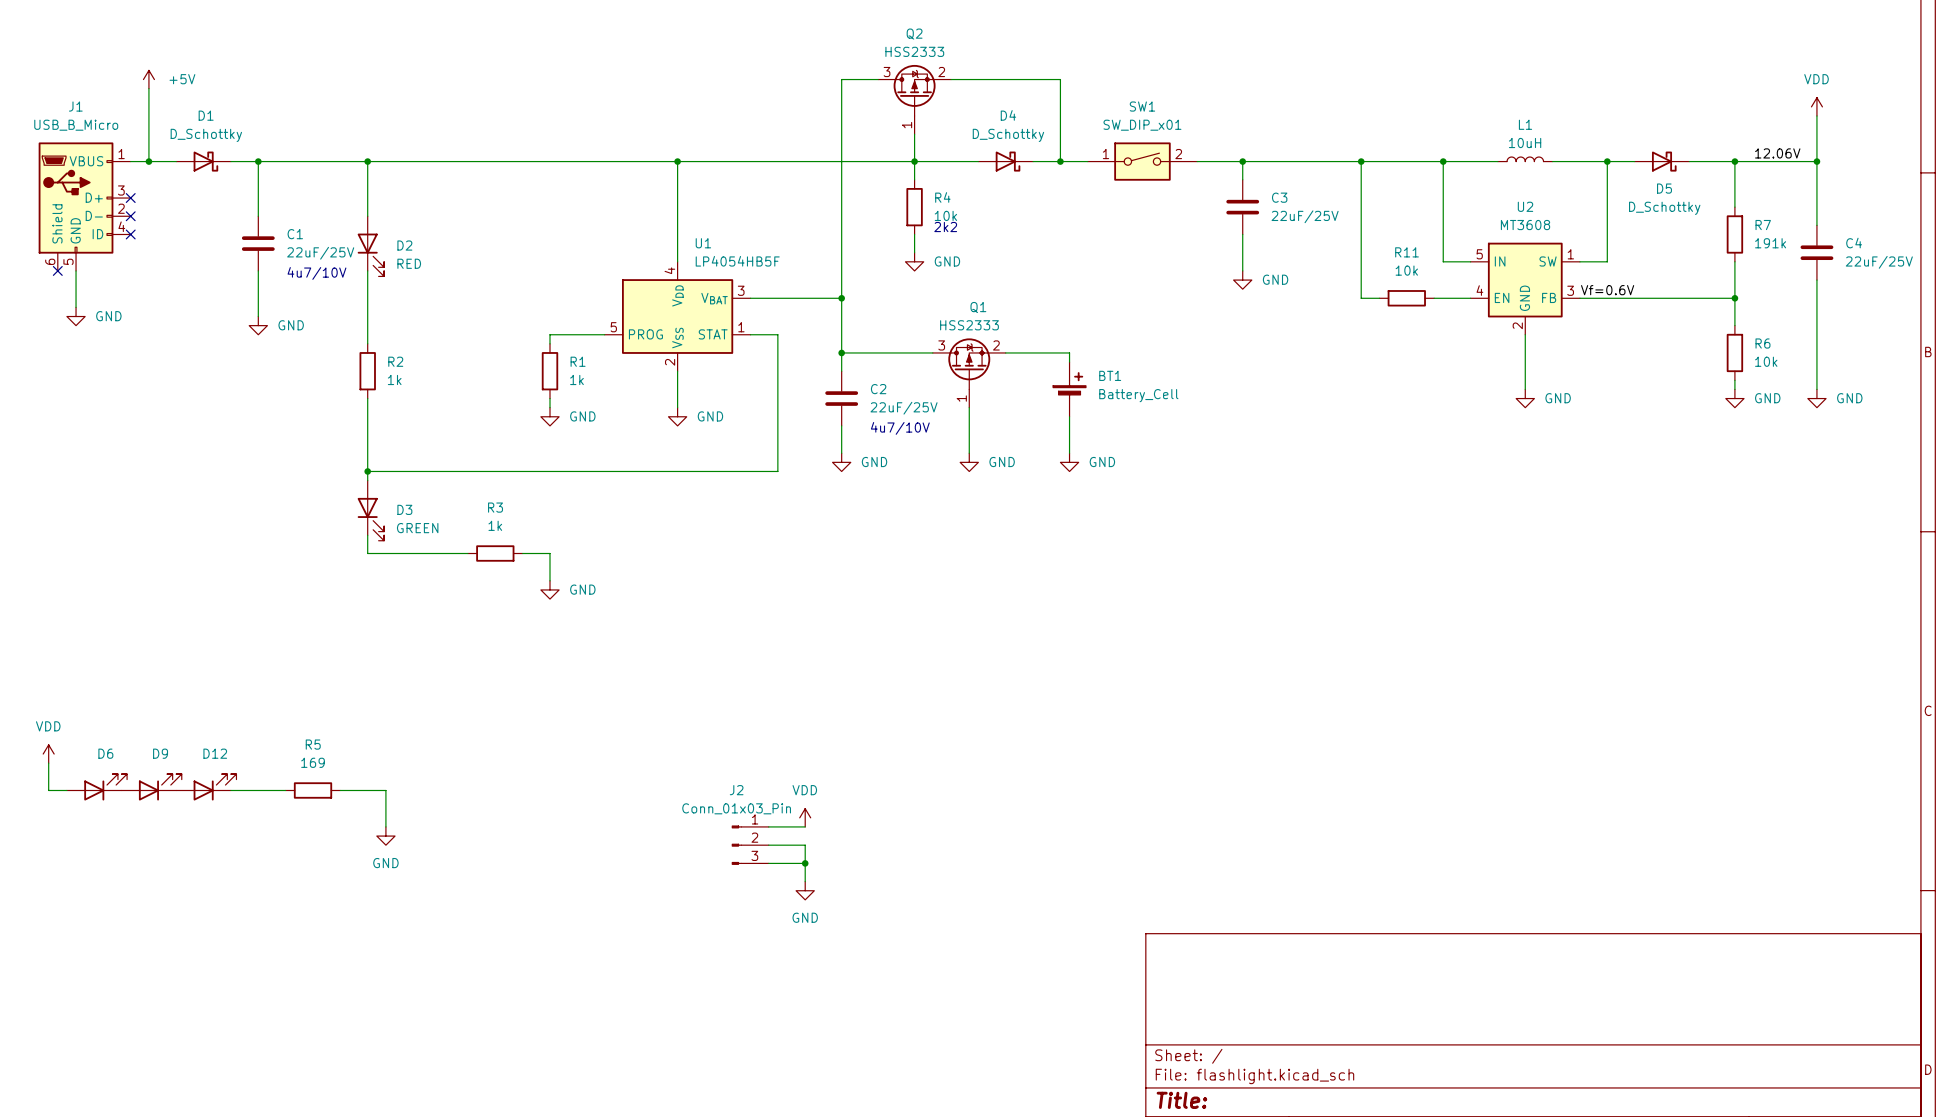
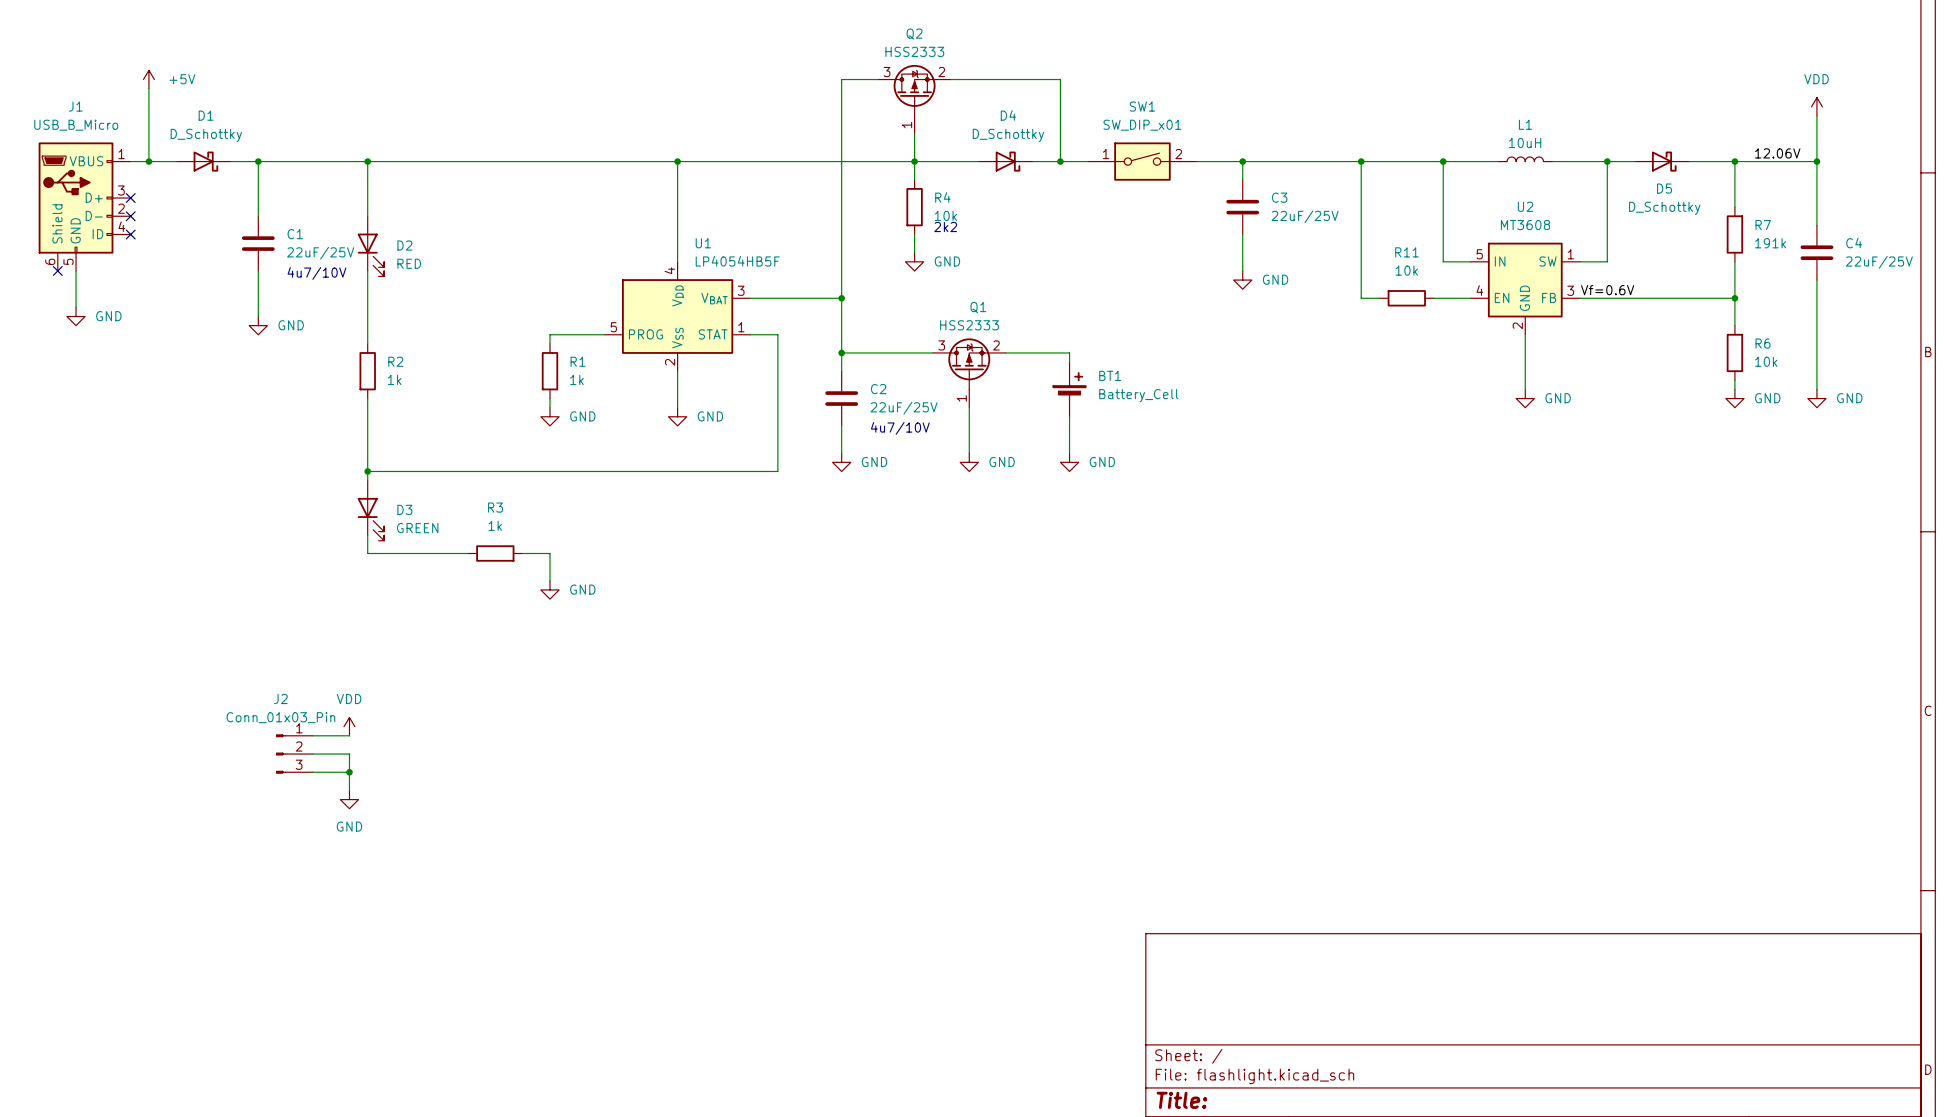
power symbol: none -> VDD (349, 726)
wire: none -> (313, 735) (349, 735)
power symbol: VDD (48, 754) -> none
wire: none -> (313, 754) (349, 754) (349, 790)
wire: (48, 763) (48, 790) (66, 790) -> none
wire: none -> (313, 772) (349, 772)
junction: none -> (349, 772)
D6: (96, 787) -> none
D9: (151, 787) -> none
D12: (206, 787) -> none
wire: (230, 790) (285, 790) -> none
R5: 169 (313, 790) -> none
wire: (340, 790) (385, 790) (385, 826) -> none
power symbol: VDD (805, 817) -> none
wire: (768, 826) (805, 826) -> none
power symbol position: GND (385, 836) -> GND (349, 799)
J2 position: (750, 845) -> (294, 754)
wire: (768, 845) (805, 845) (805, 881) -> none
wire: (768, 863) (805, 863) -> none
junction: (805, 863) -> none
power symbol: GND (805, 890) -> none

